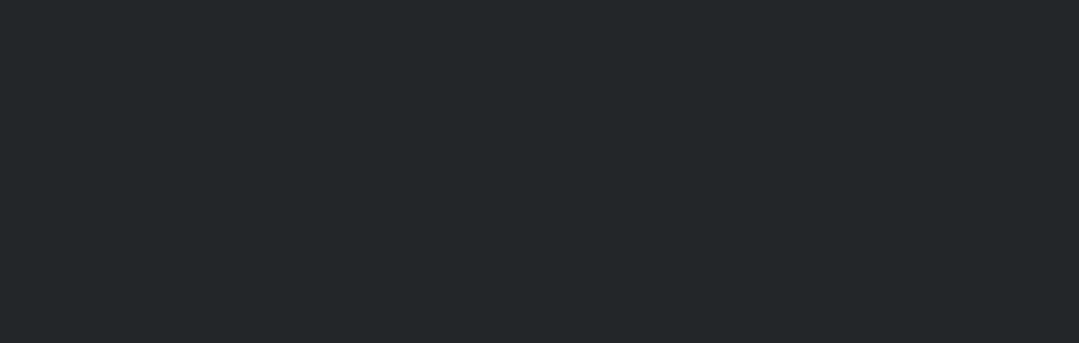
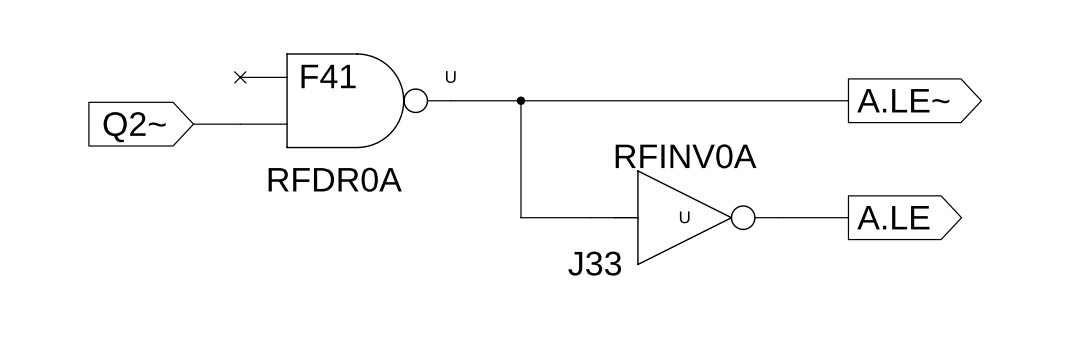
no-connect mark: none -> (240, 77)
U: none -> (345, 100)
wire: none -> (450, 100) (848, 100)
wire: none -> (520, 100) (520, 217) (591, 217)
junction: none -> (520, 100)
global label: none -> A.LE~ (903, 100)
wire: none -> (193, 124) (240, 124)
global label: none -> Q2~ (134, 127)
U: none -> (684, 217)
wire: none -> (778, 217) (848, 217)
global label: none -> A.LE (893, 217)

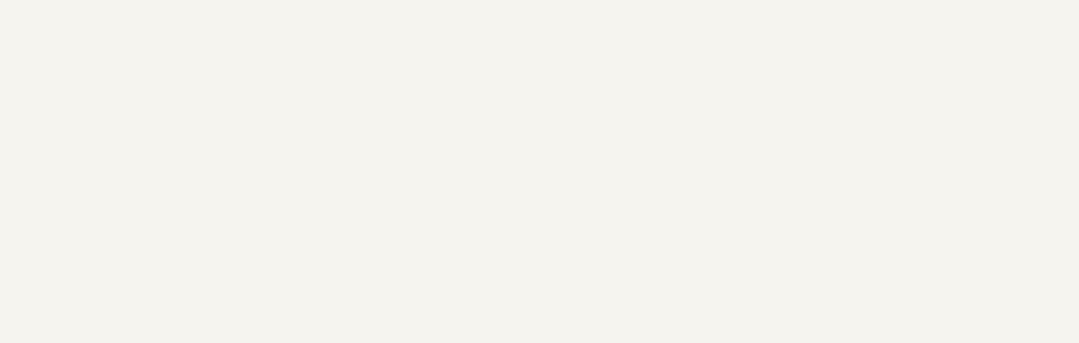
no-connect mark: (240, 77) -> none
U: (345, 100) -> none
wire: (450, 100) (848, 100) -> none
wire: (520, 100) (520, 217) (591, 217) -> none
junction: (520, 100) -> none
global label: A.LE~ (903, 100) -> none
wire: (193, 124) (240, 124) -> none
global label: Q2~ (134, 127) -> none
U: (684, 217) -> none
wire: (778, 217) (848, 217) -> none
global label: A.LE (893, 217) -> none

